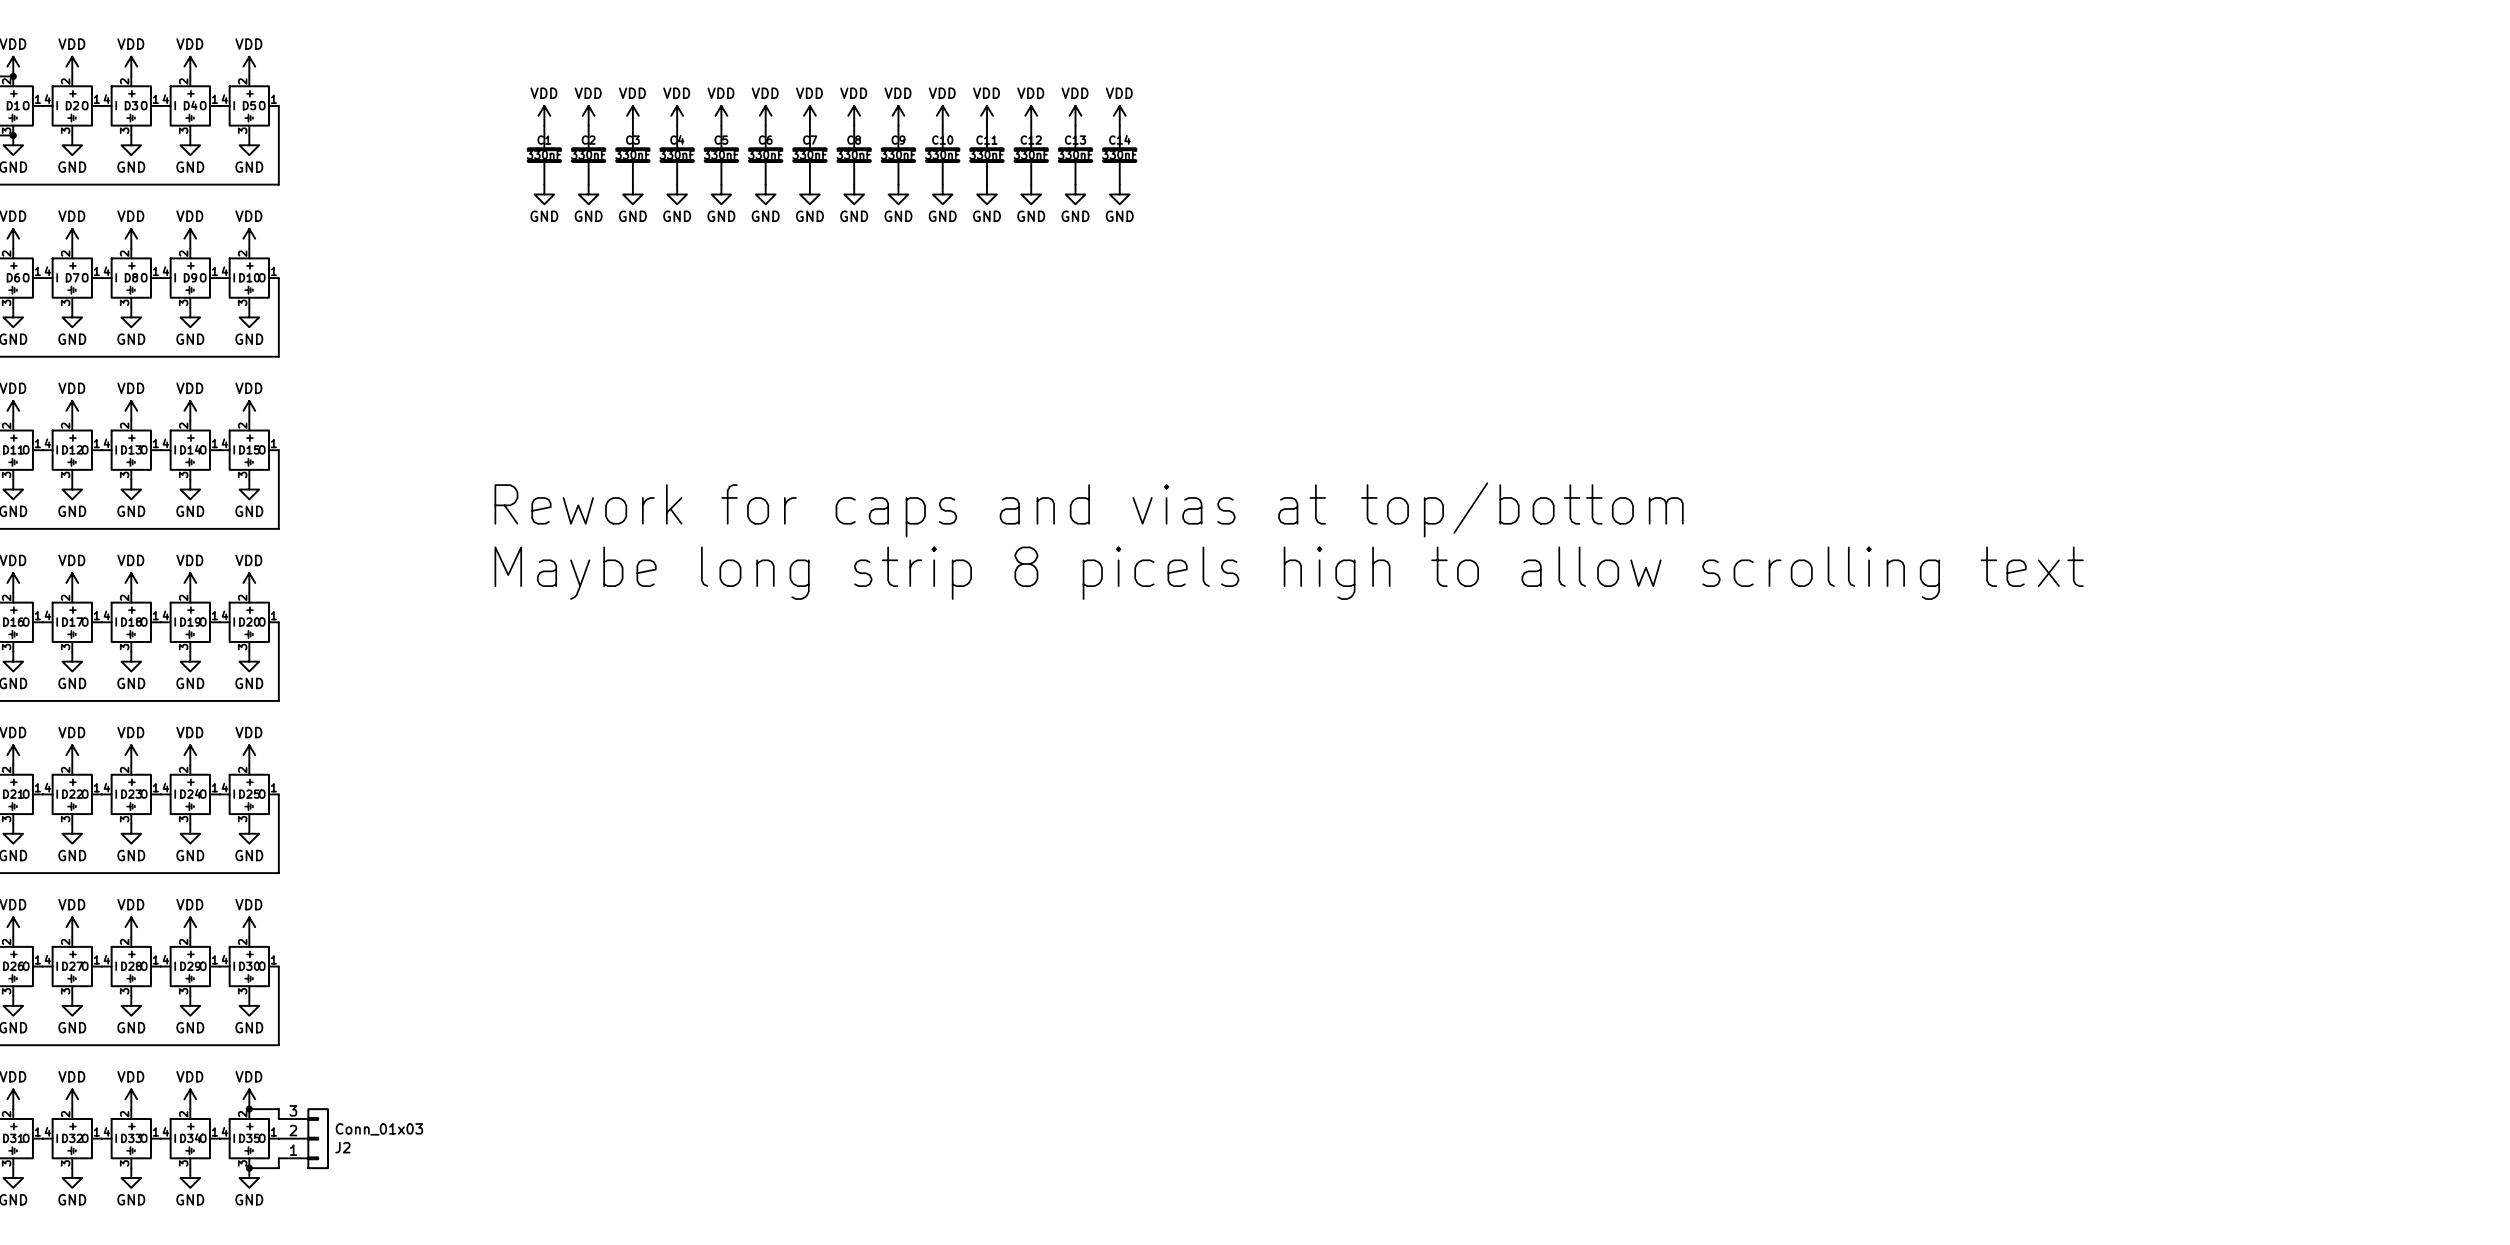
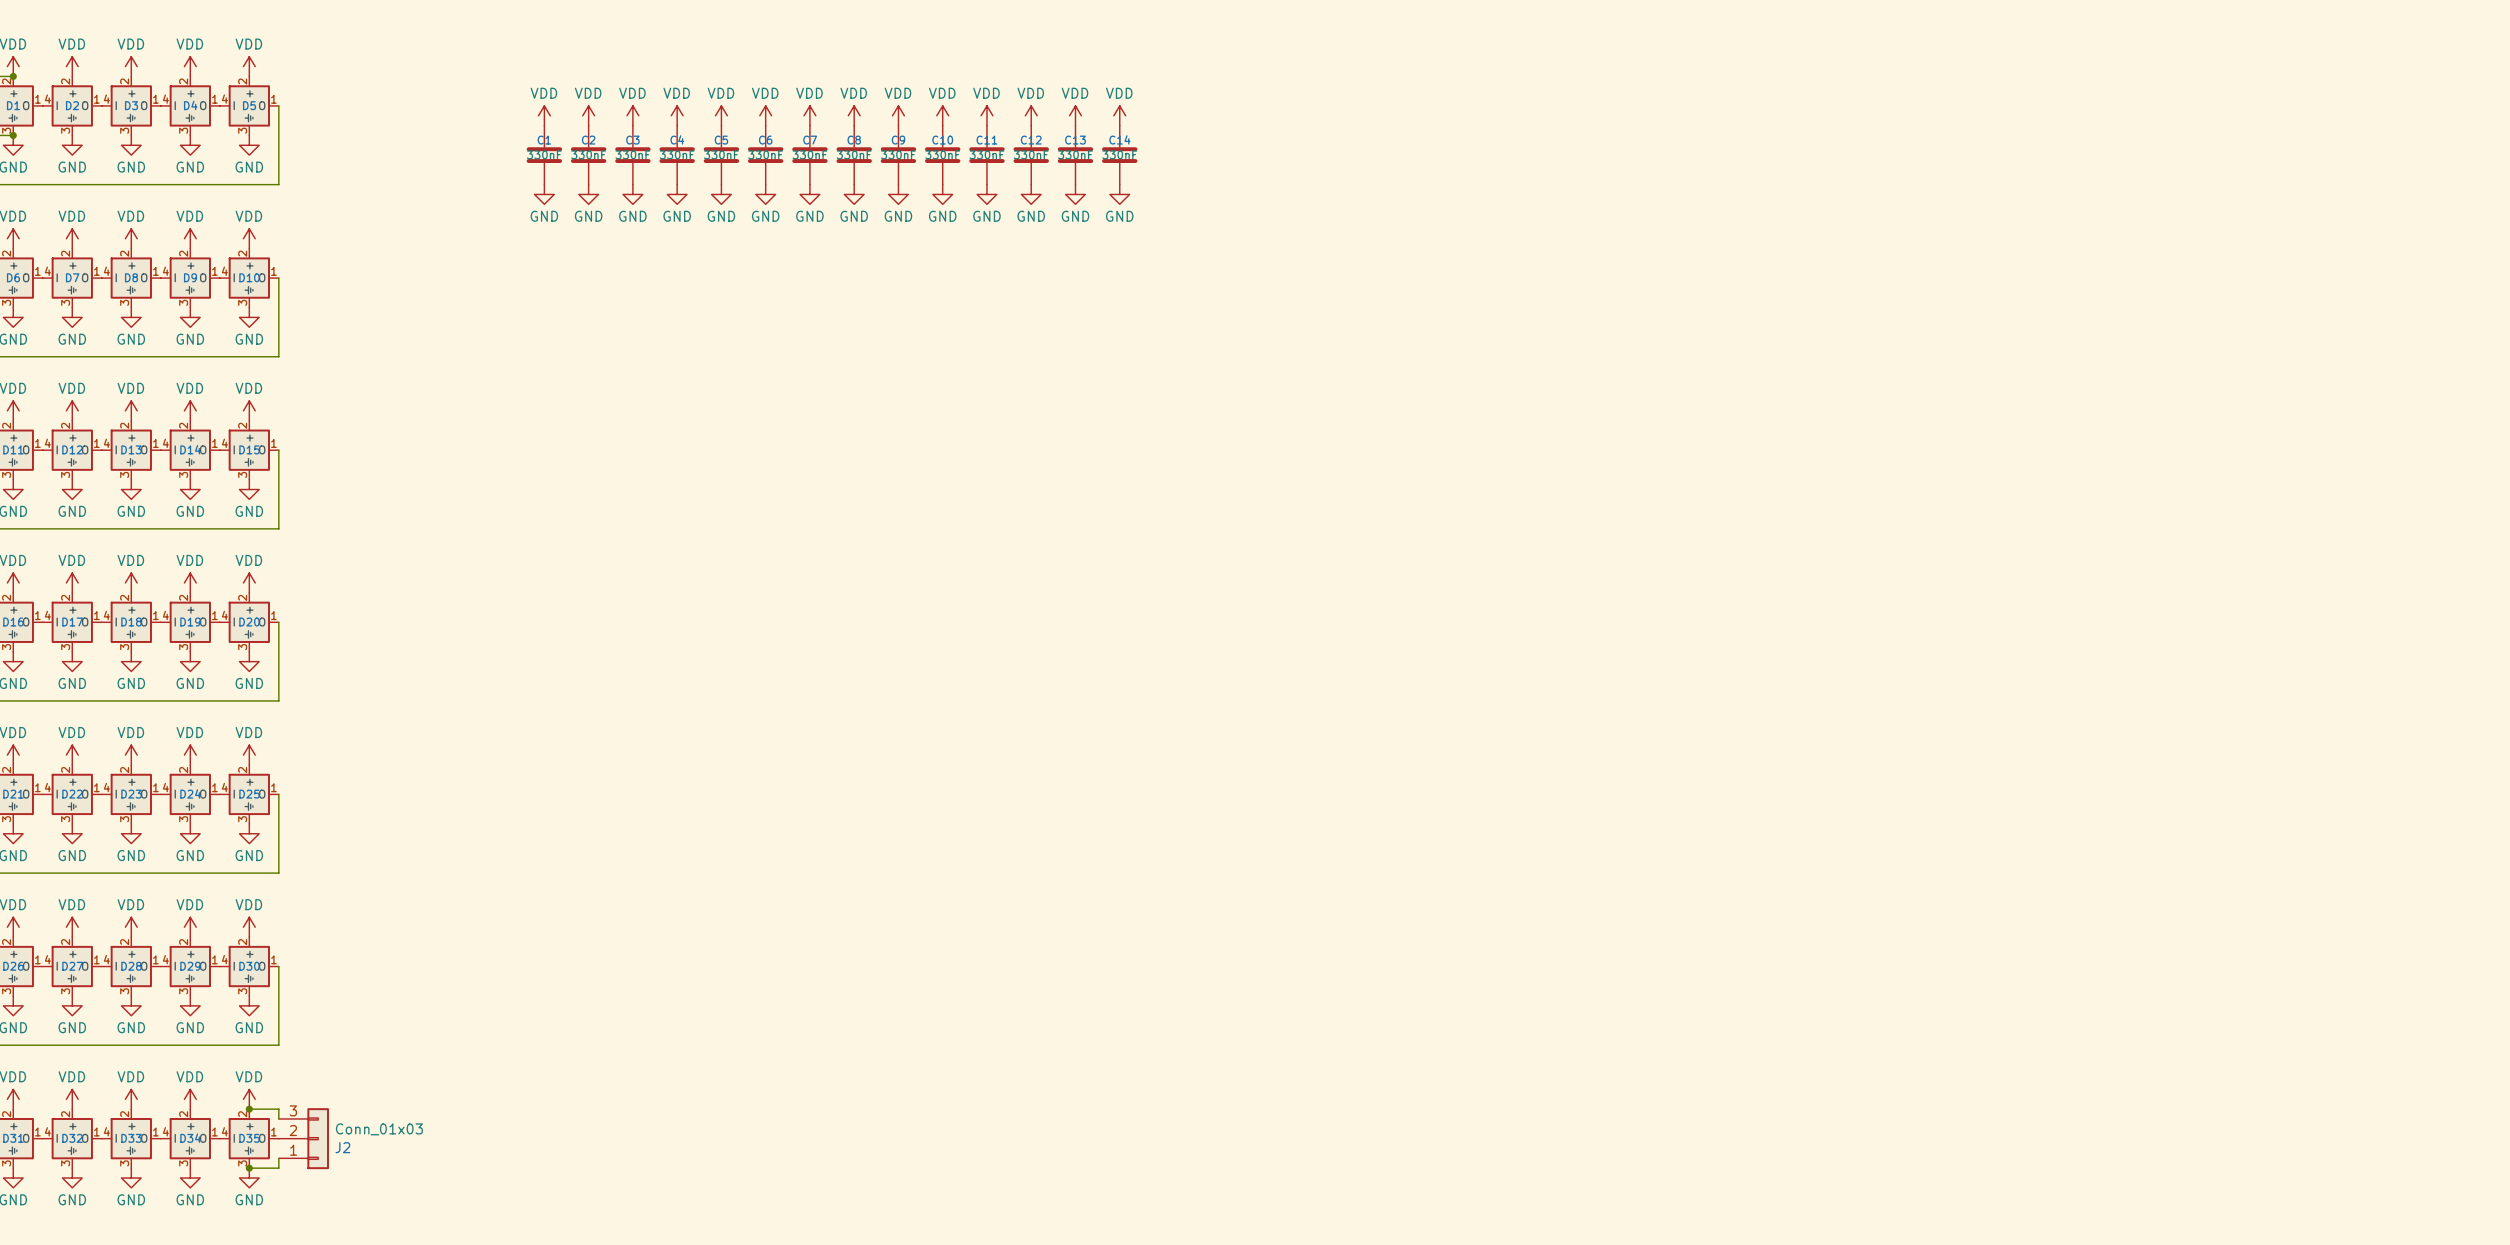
text: Rework for caps and vias at top/bottom (1089, 509) -> none
text: Maybe long strip 8 picels high to allow scrolling text (1289, 573) -> none

